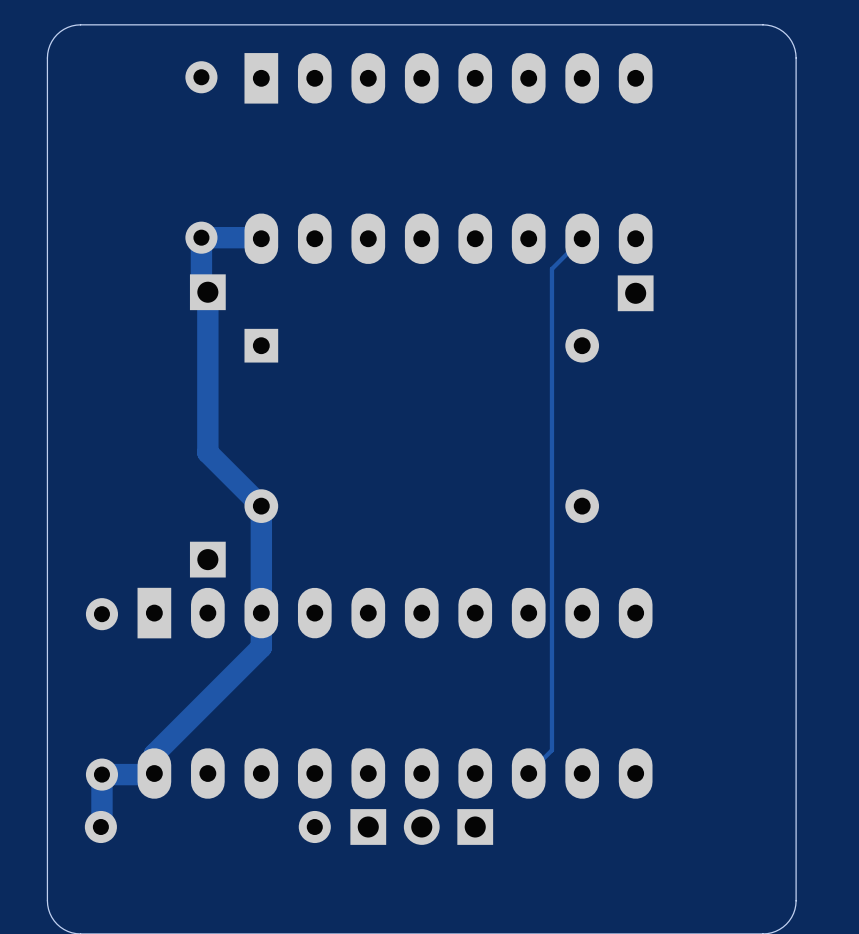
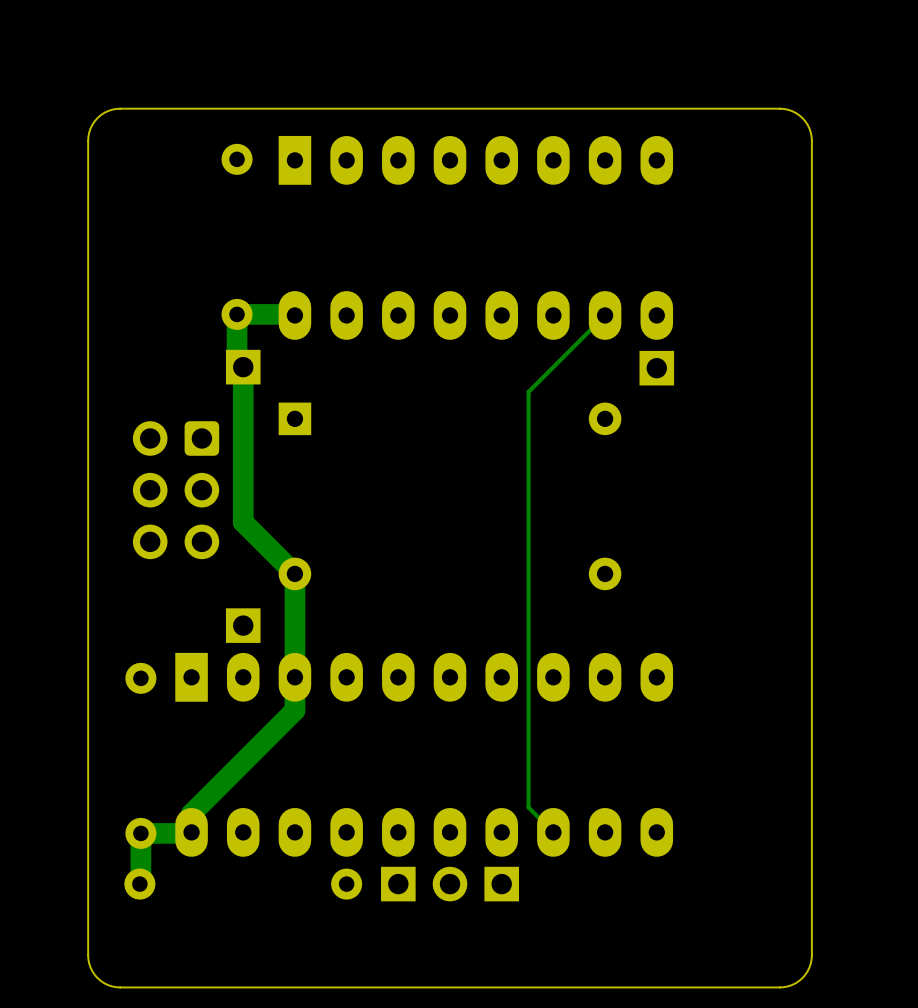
track: (551, 268) (551, 750) (528, 773) -> (575, 344) (528, 391) (528, 807) (553, 832)
part: none -> (176, 490)

